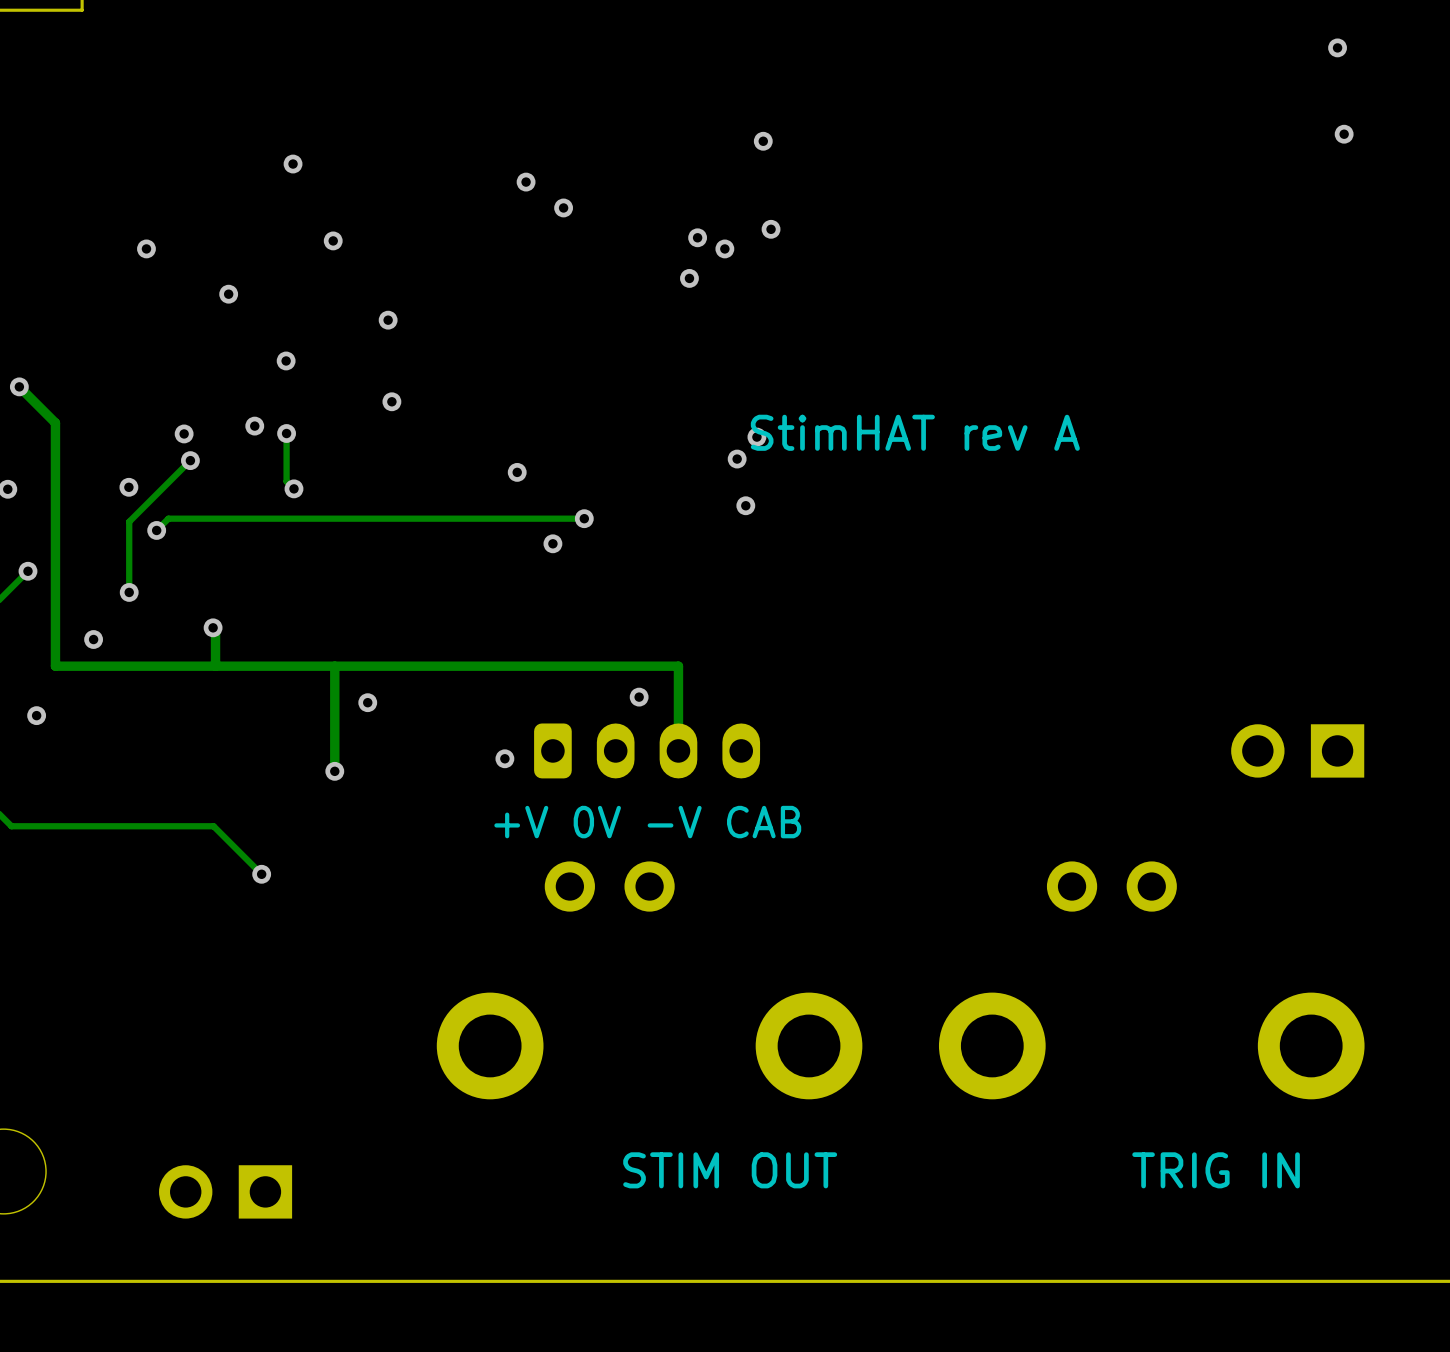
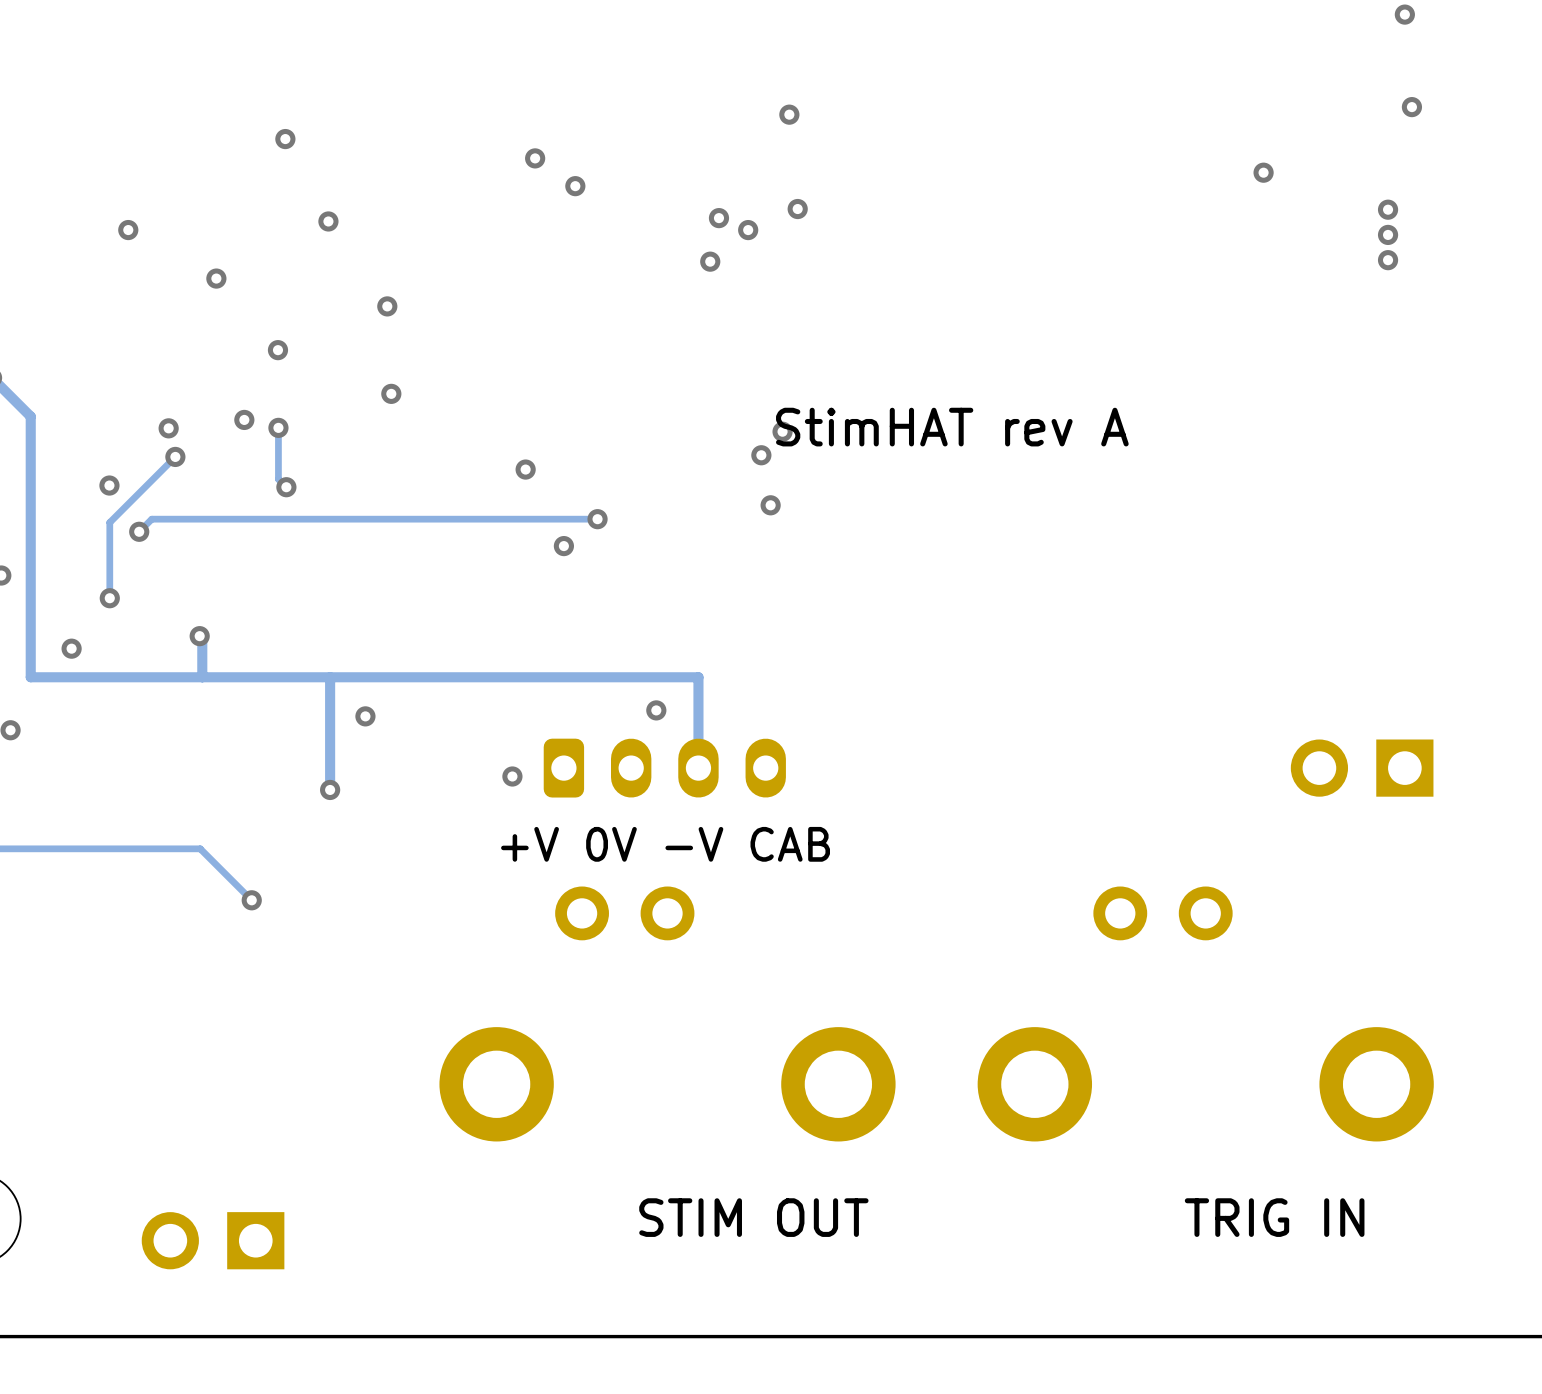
via: none -> (1263, 172)
via: none -> (1388, 209)
via: none -> (1388, 234)
via: none -> (1388, 260)

